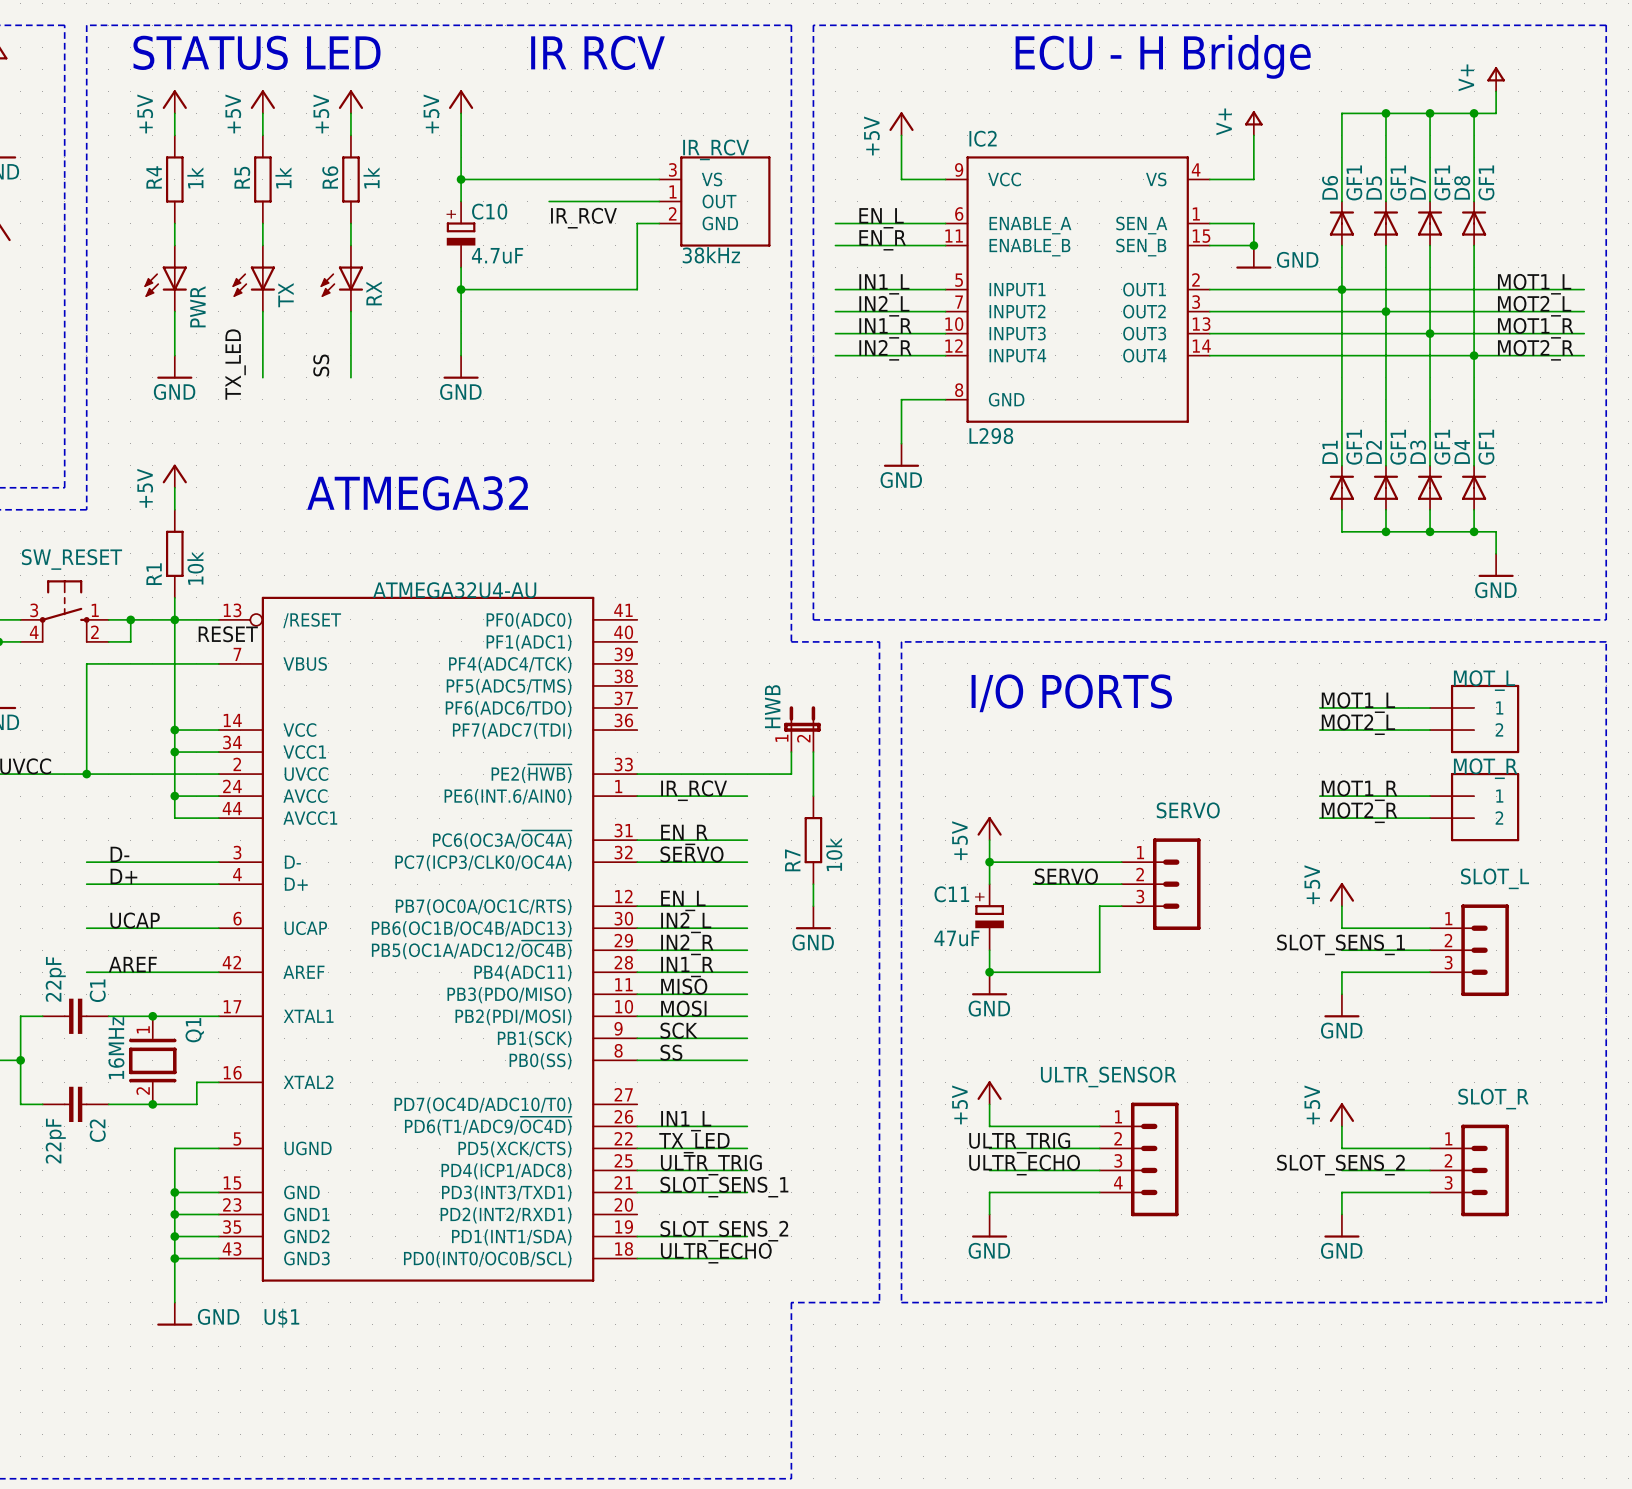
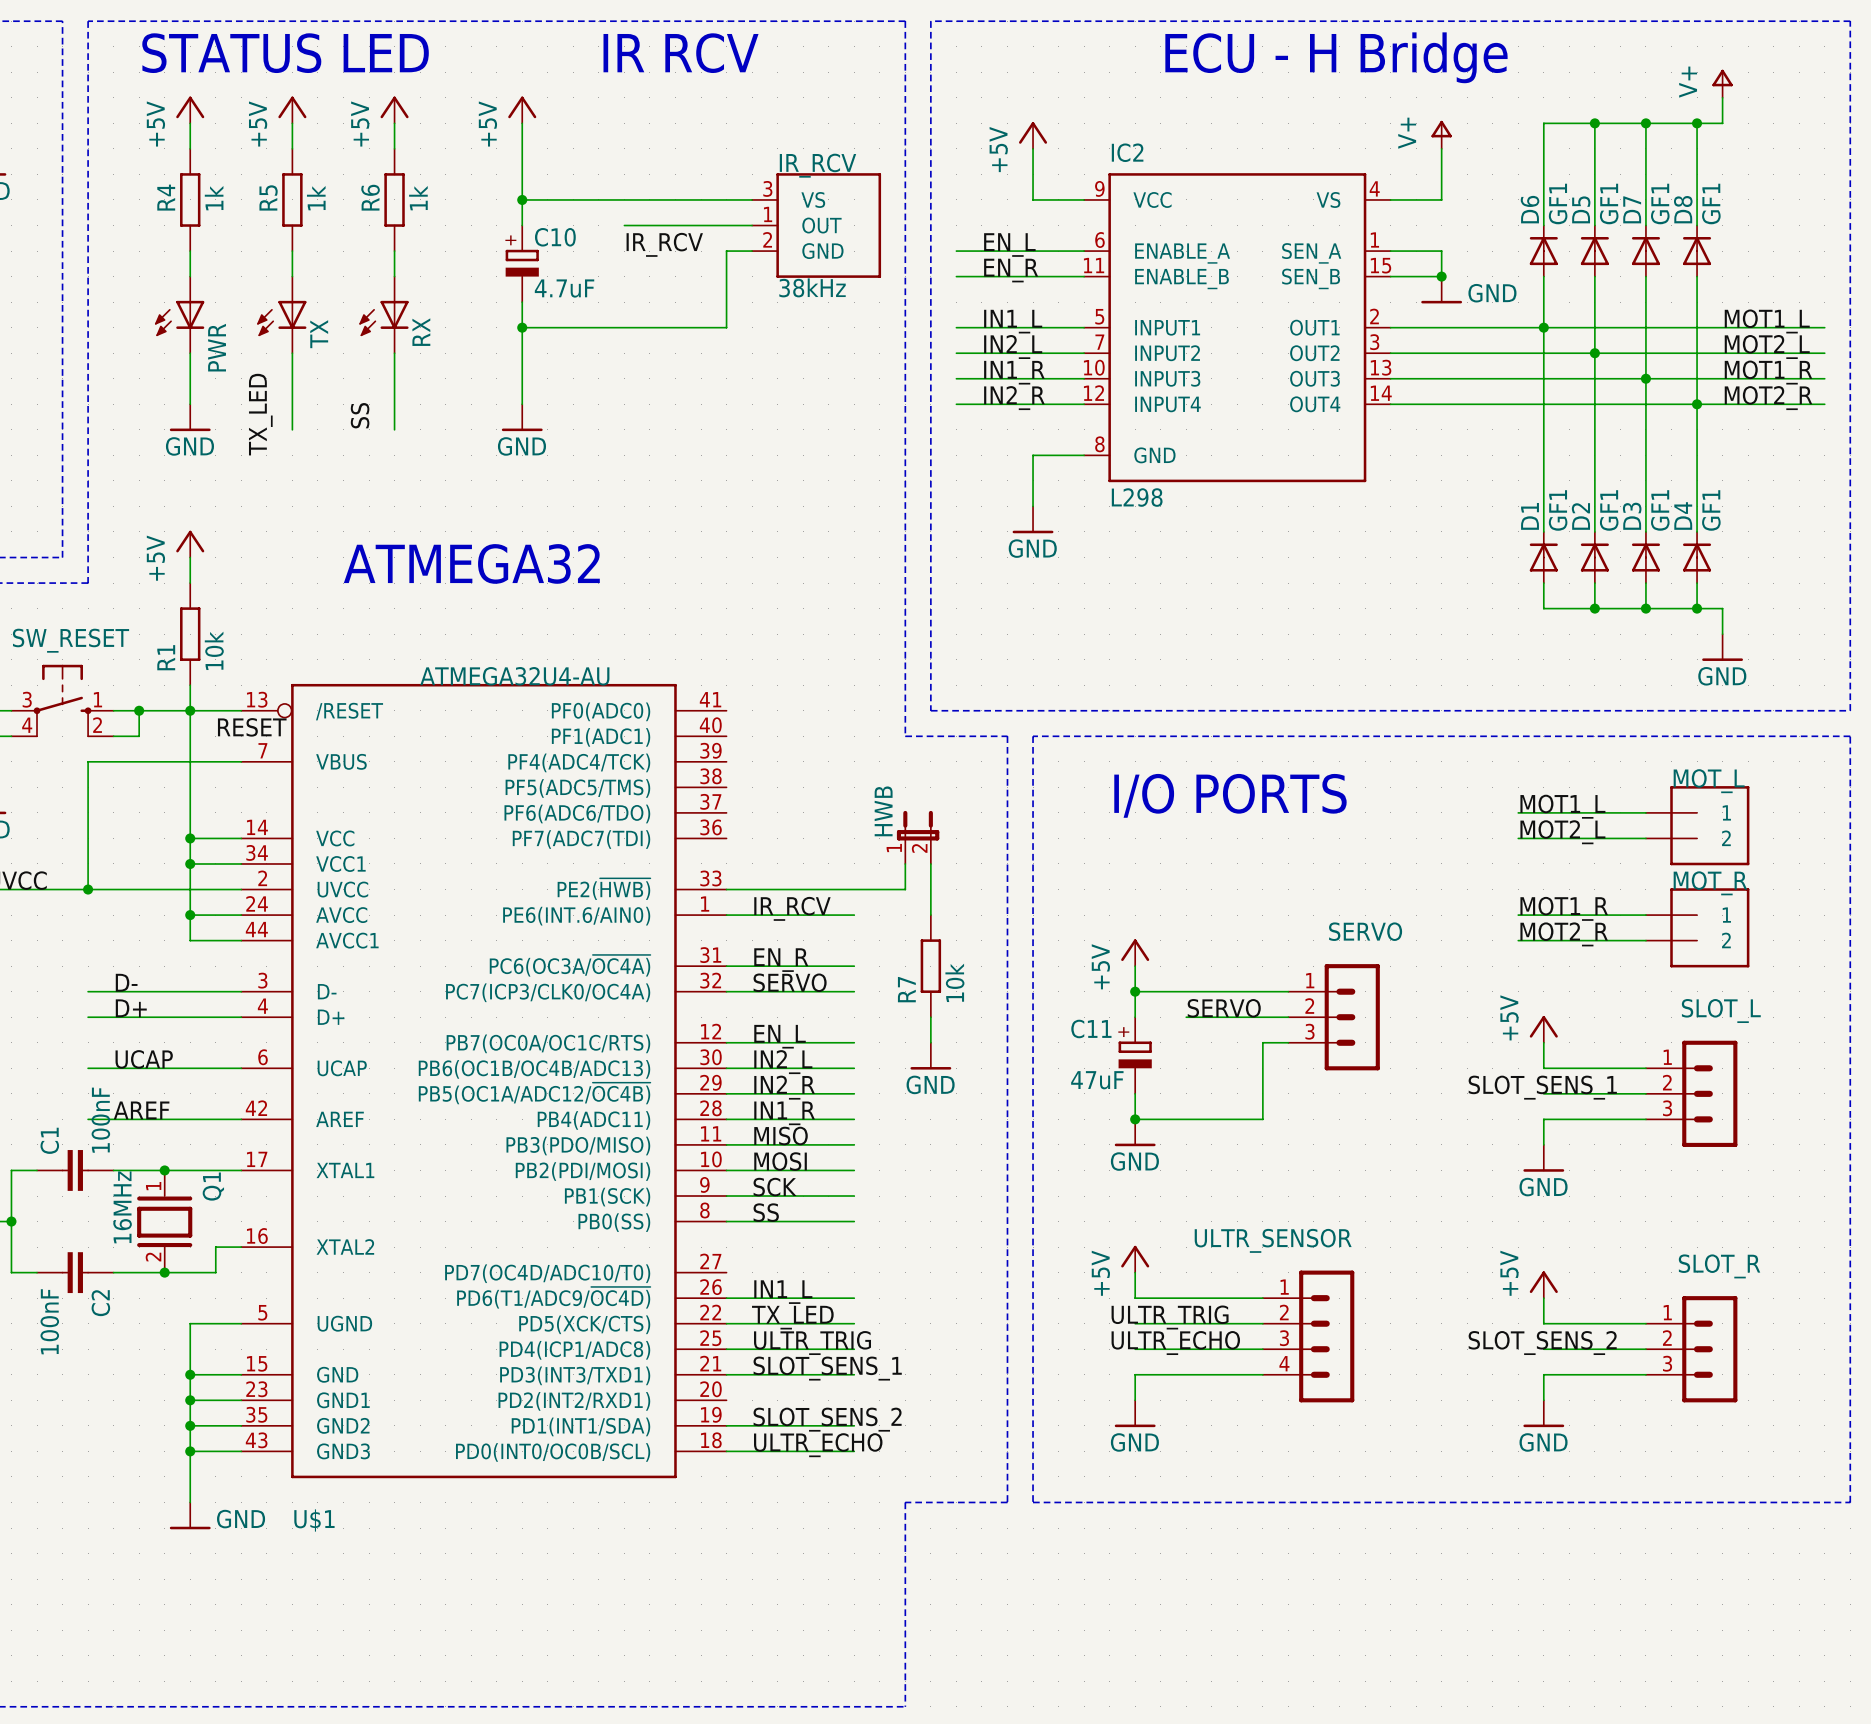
C1 value: 22pF (55, 979) -> 100nF (100, 1120)
C1 name position: C1 (97, 990) -> C1 (49, 1140)
C2 value: 22pF (55, 1141) -> 100nF (49, 1321)

